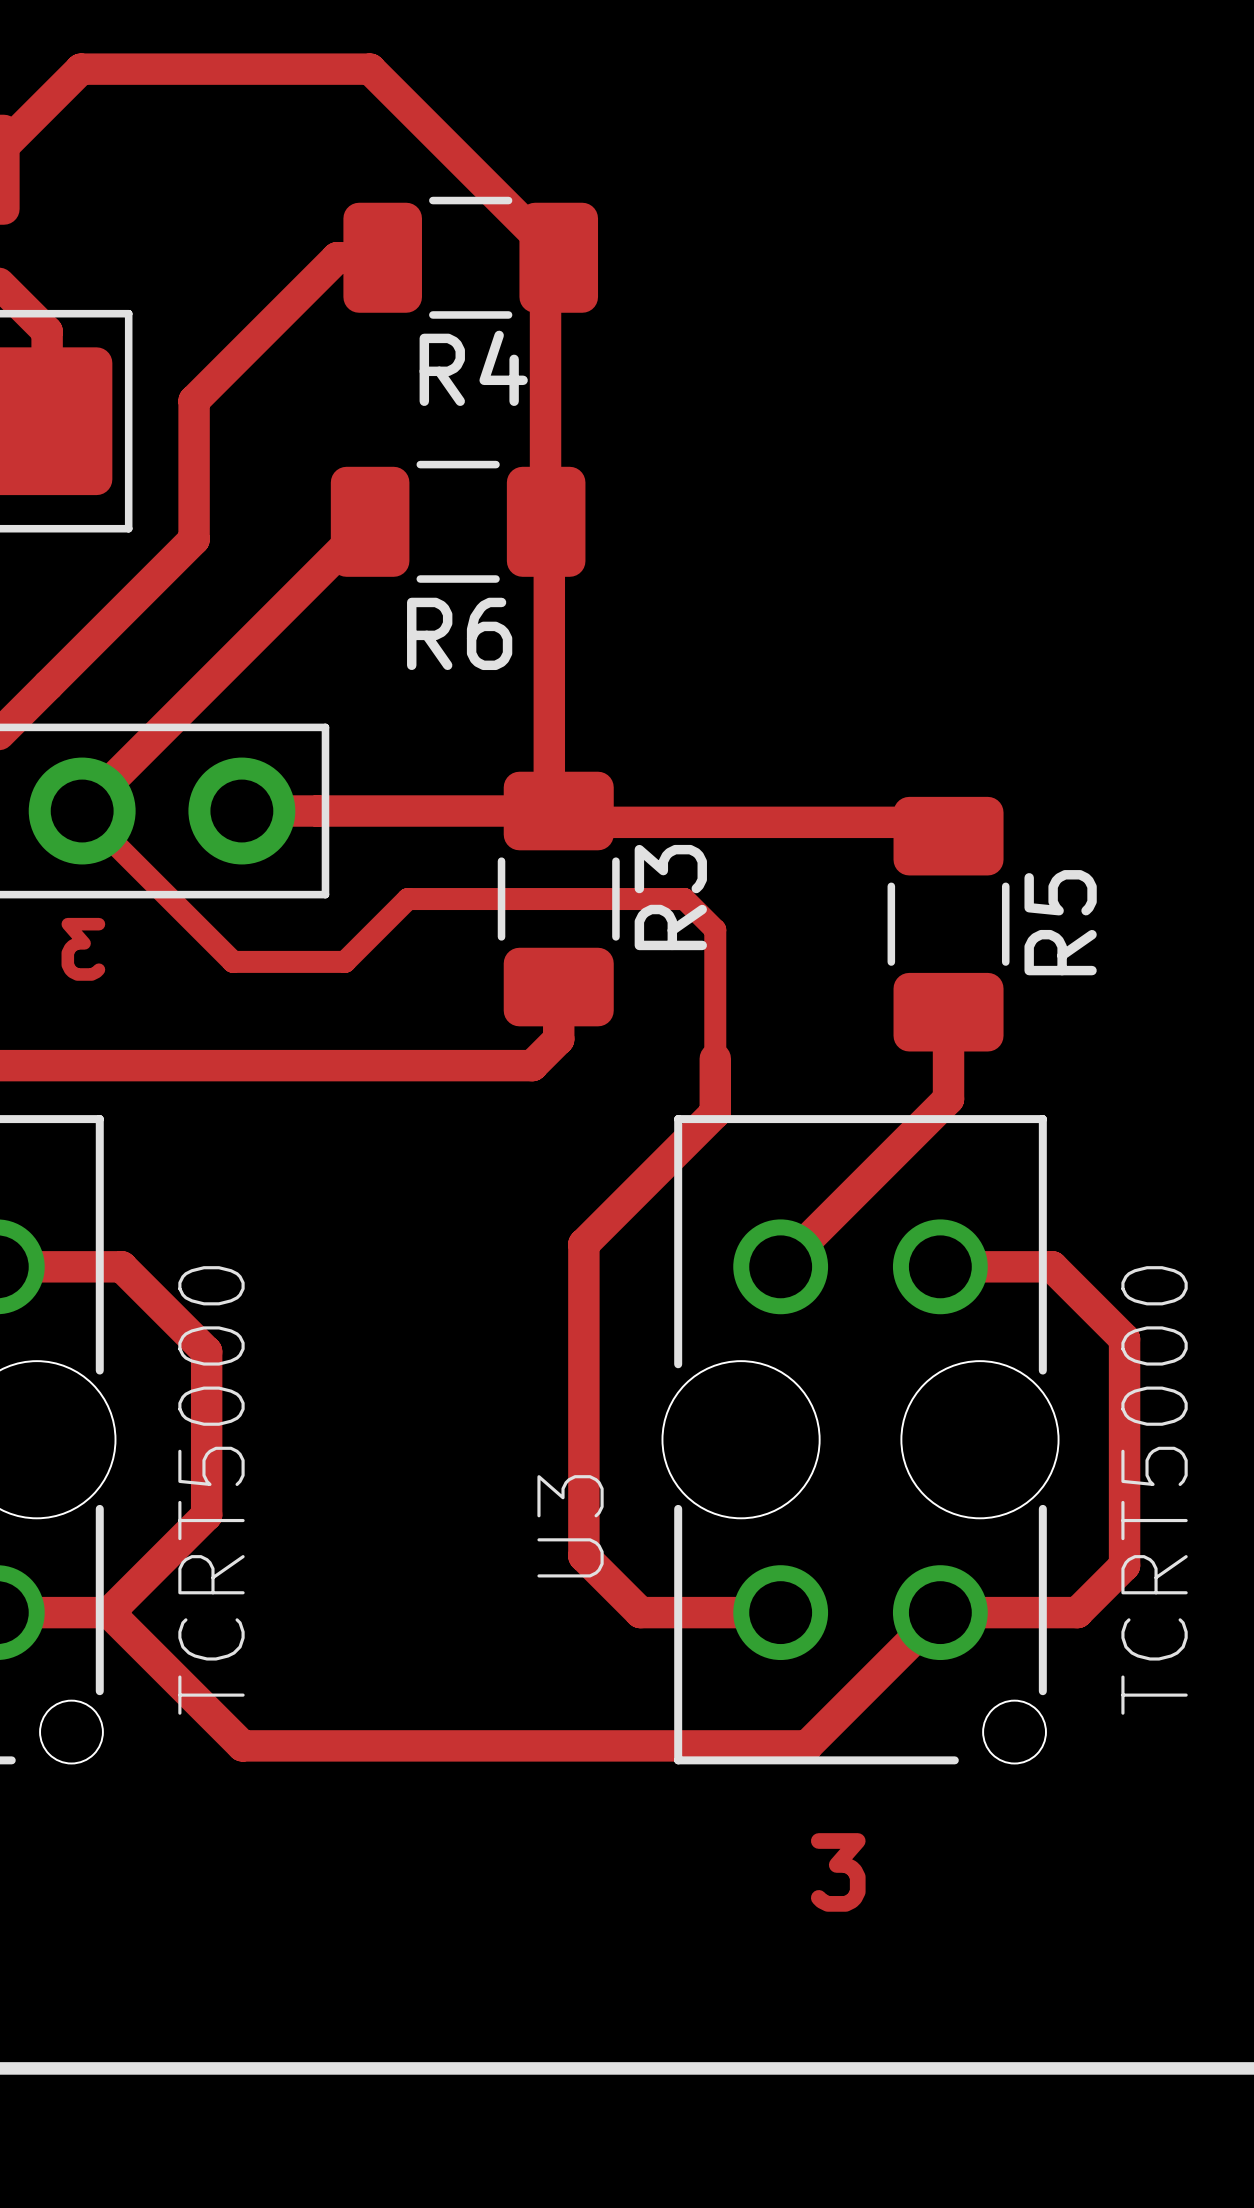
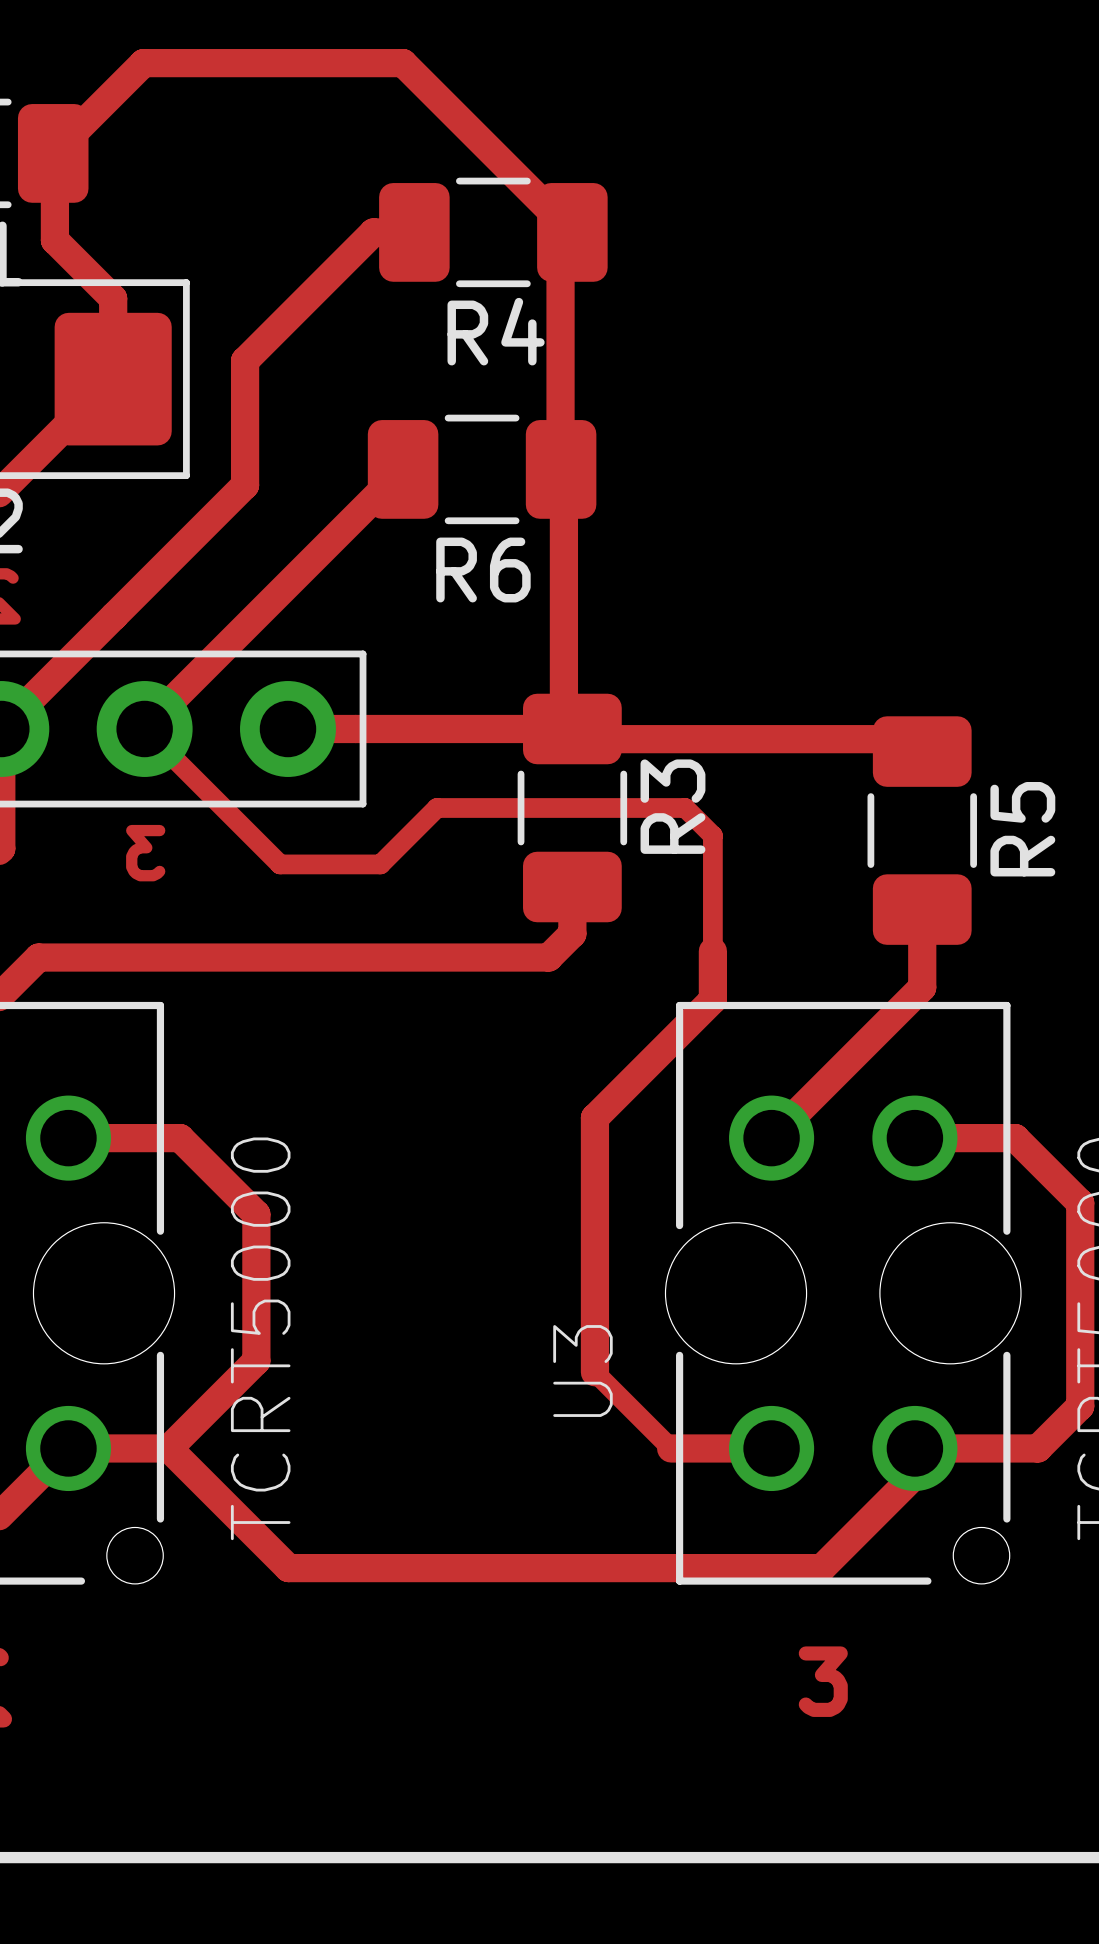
top track: (583, 1527) (583, 1556) (640, 1612) (668, 1612) -> (594, 1372) (671, 1448)
top track: (940, 1612) (807, 1745) -> (914, 1448) (914, 1474) (821, 1568) (795, 1568)

